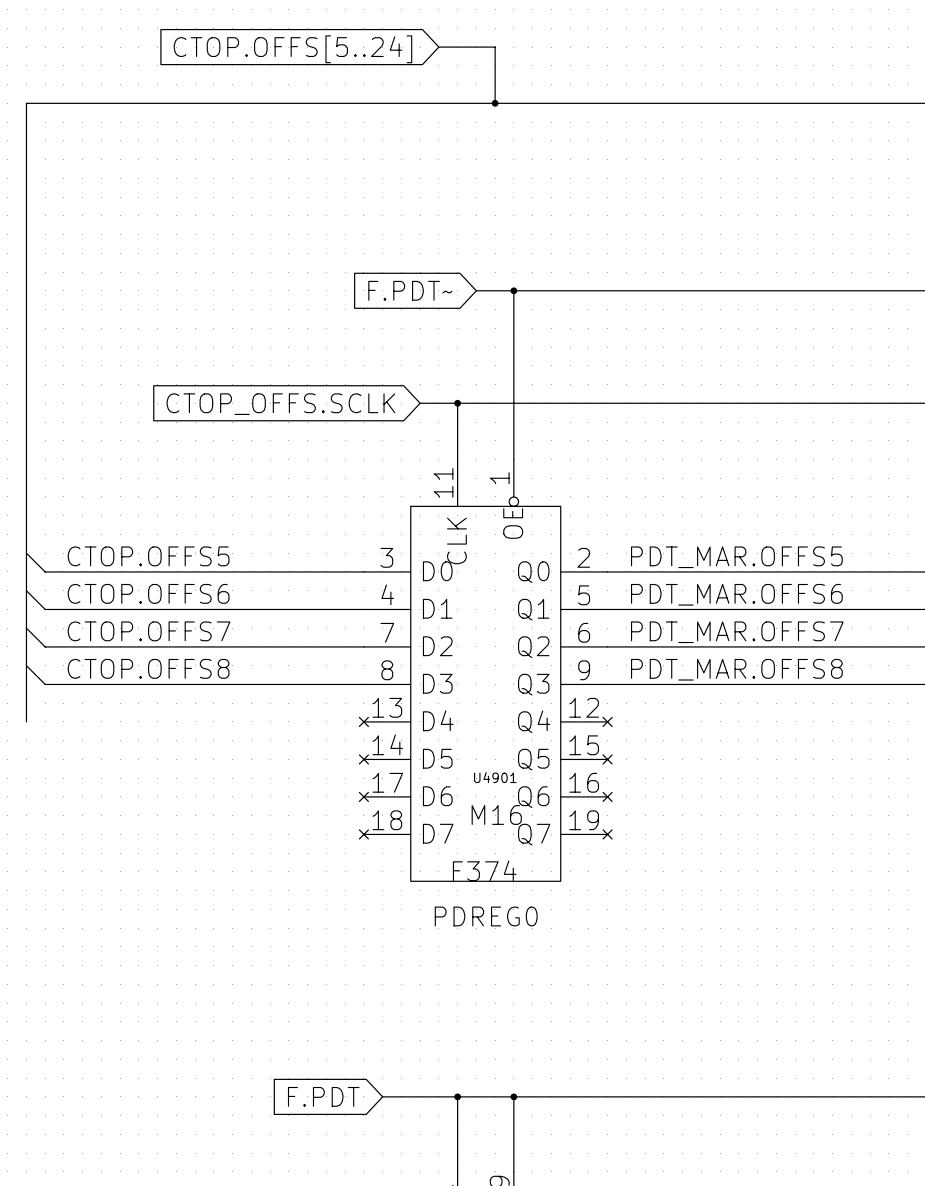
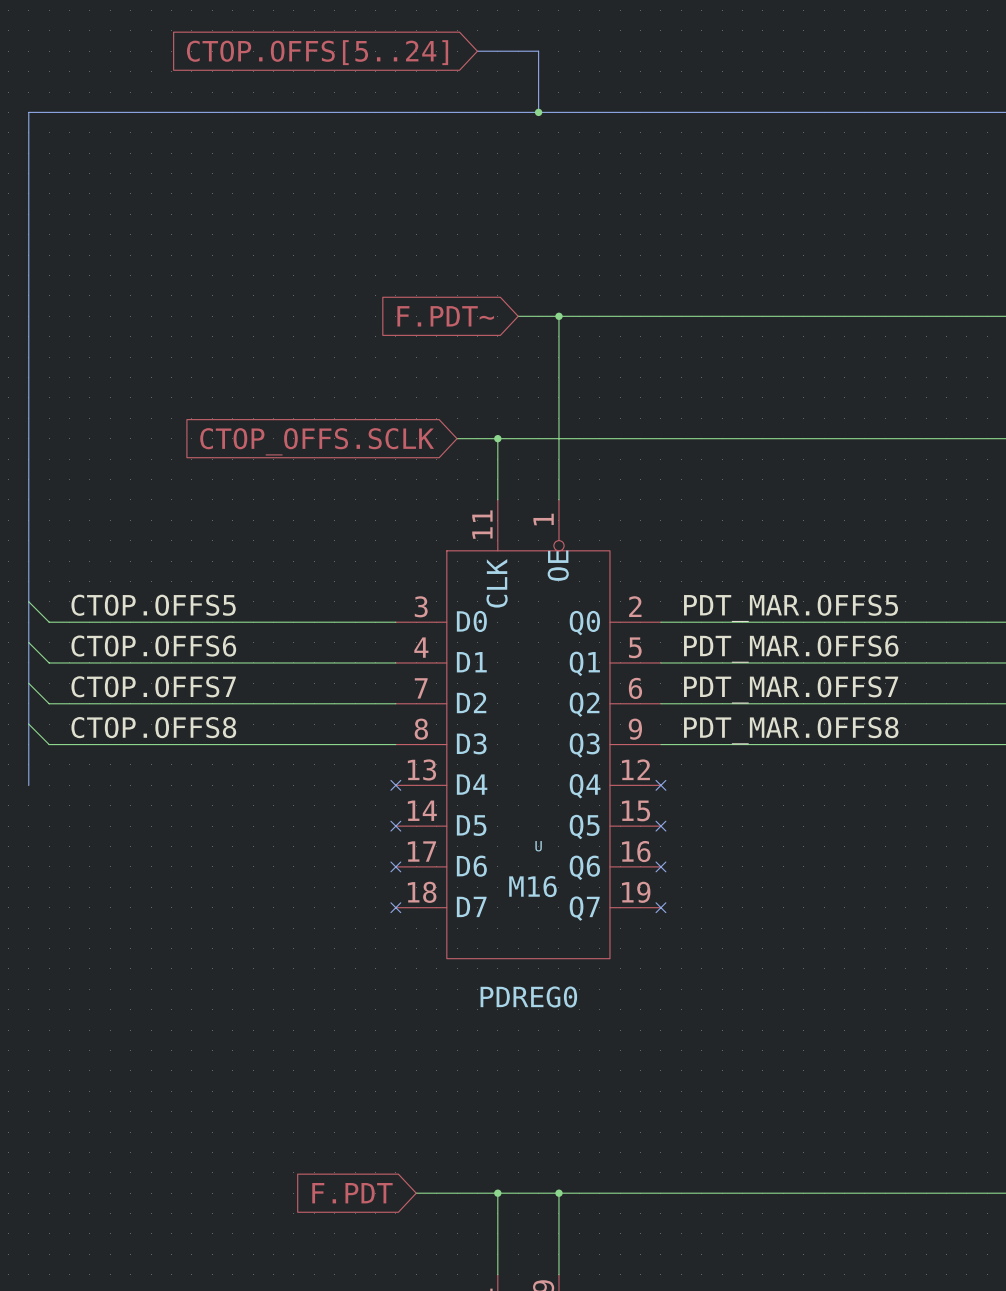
U4901 name: U4901 (495, 777) -> U (538, 846)
U4901 value: F374 (484, 870) -> none

